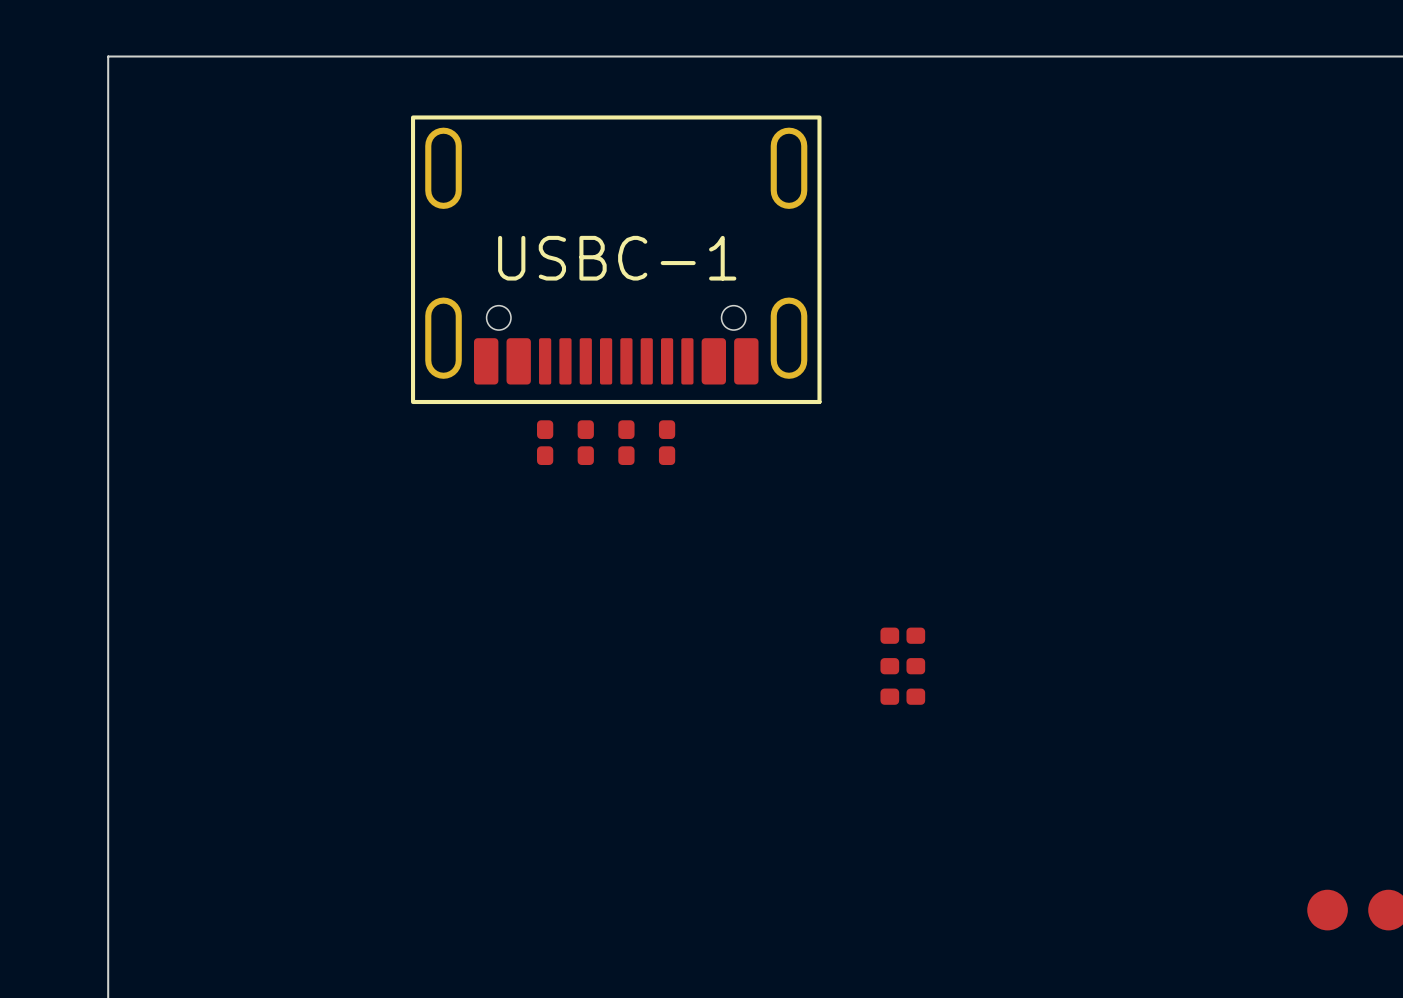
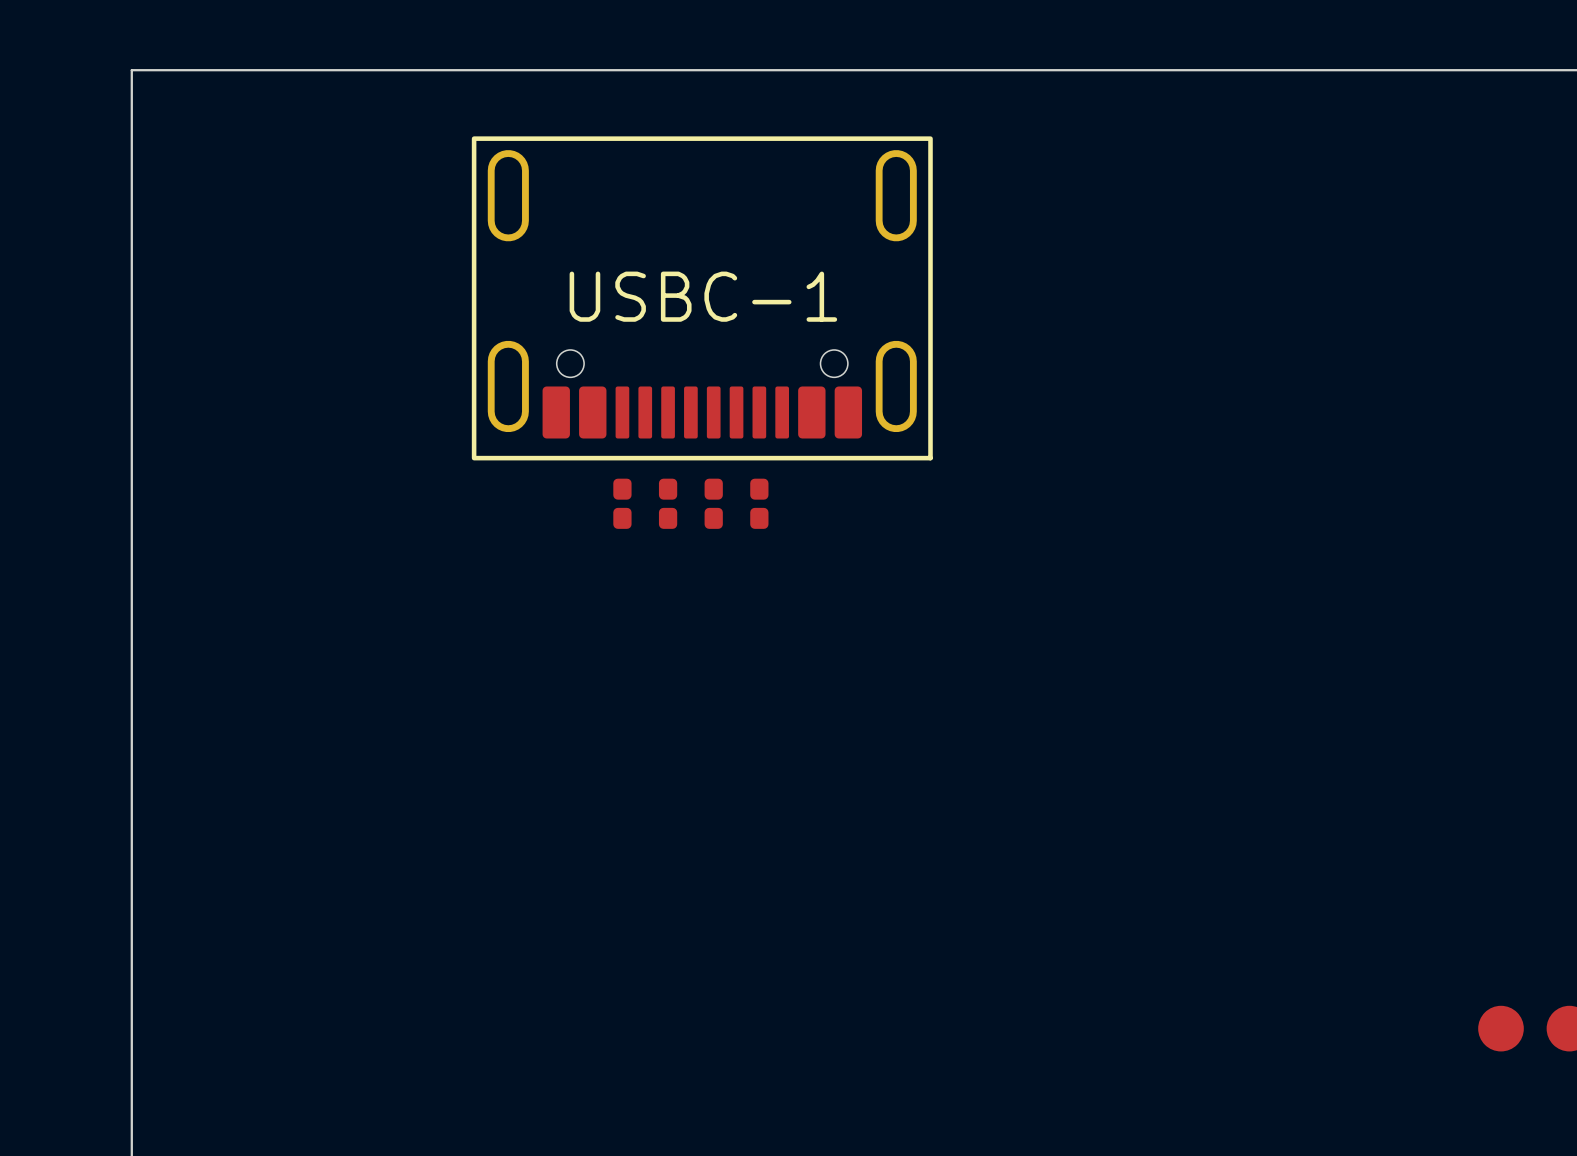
part: (902, 635) -> none
part: (902, 666) -> none
part: (902, 696) -> none

